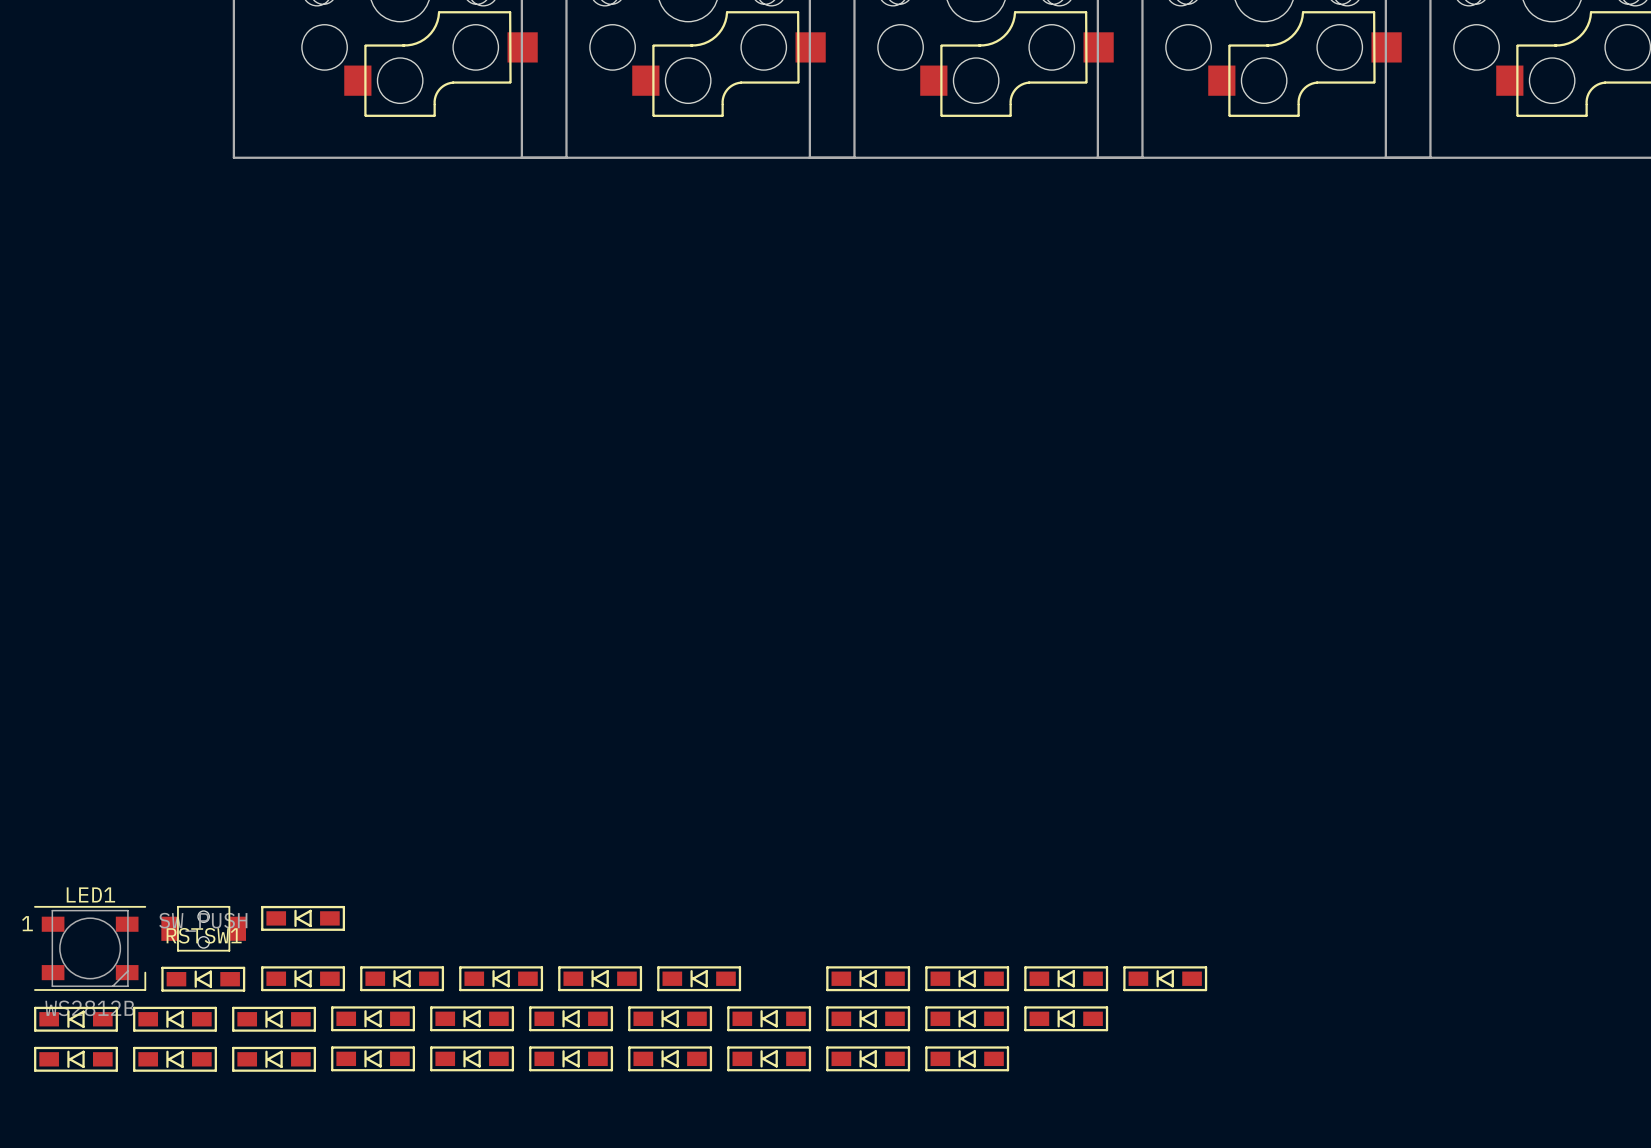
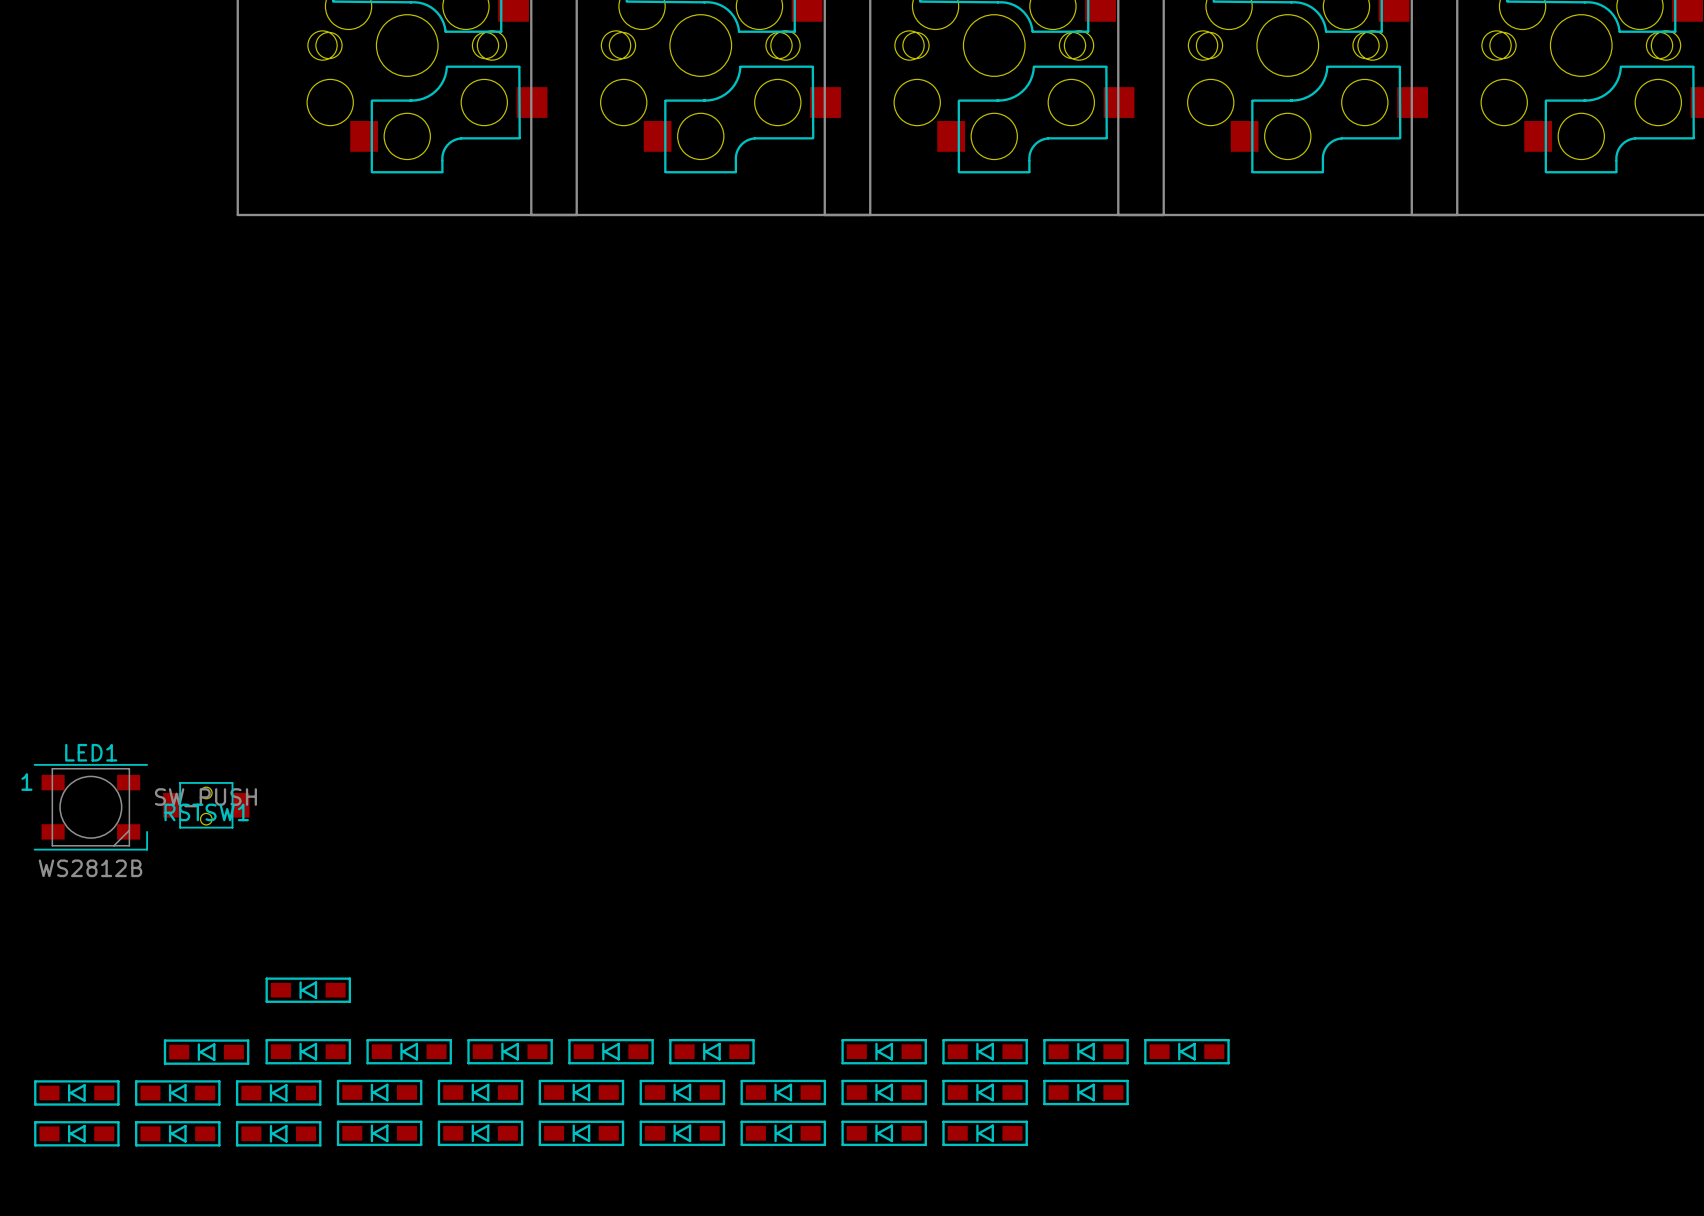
RSTSW1 position: (203, 928) -> (206, 805)
LED1 position: (90, 948) -> (90, 807)

